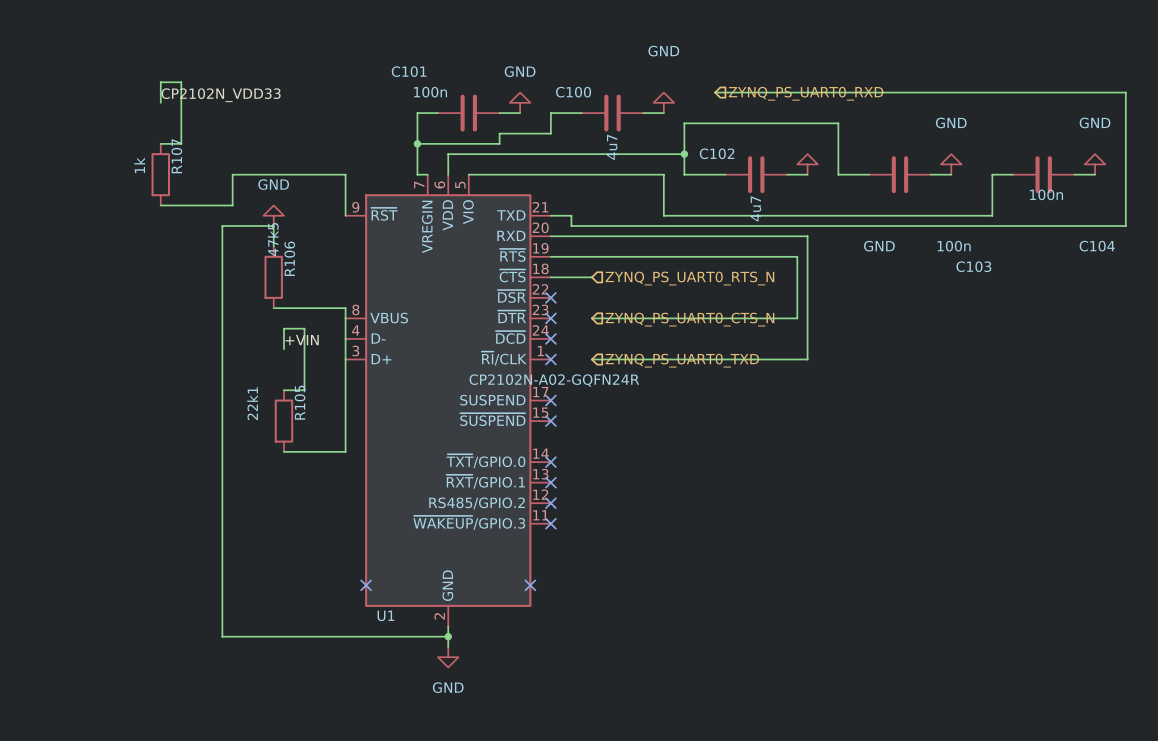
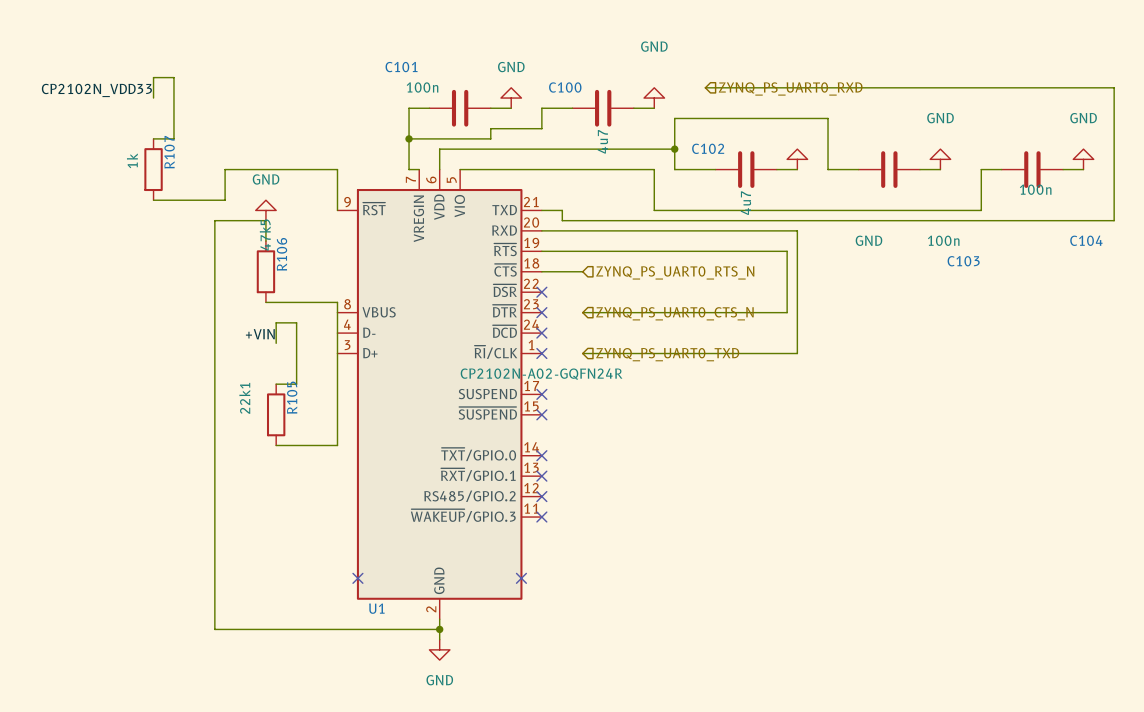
label position: CP2102N_VDD33 (221, 95) -> CP2102N_VDD33 (96, 90)
label position: +VIN (302, 340) -> +VIN (260, 334)

